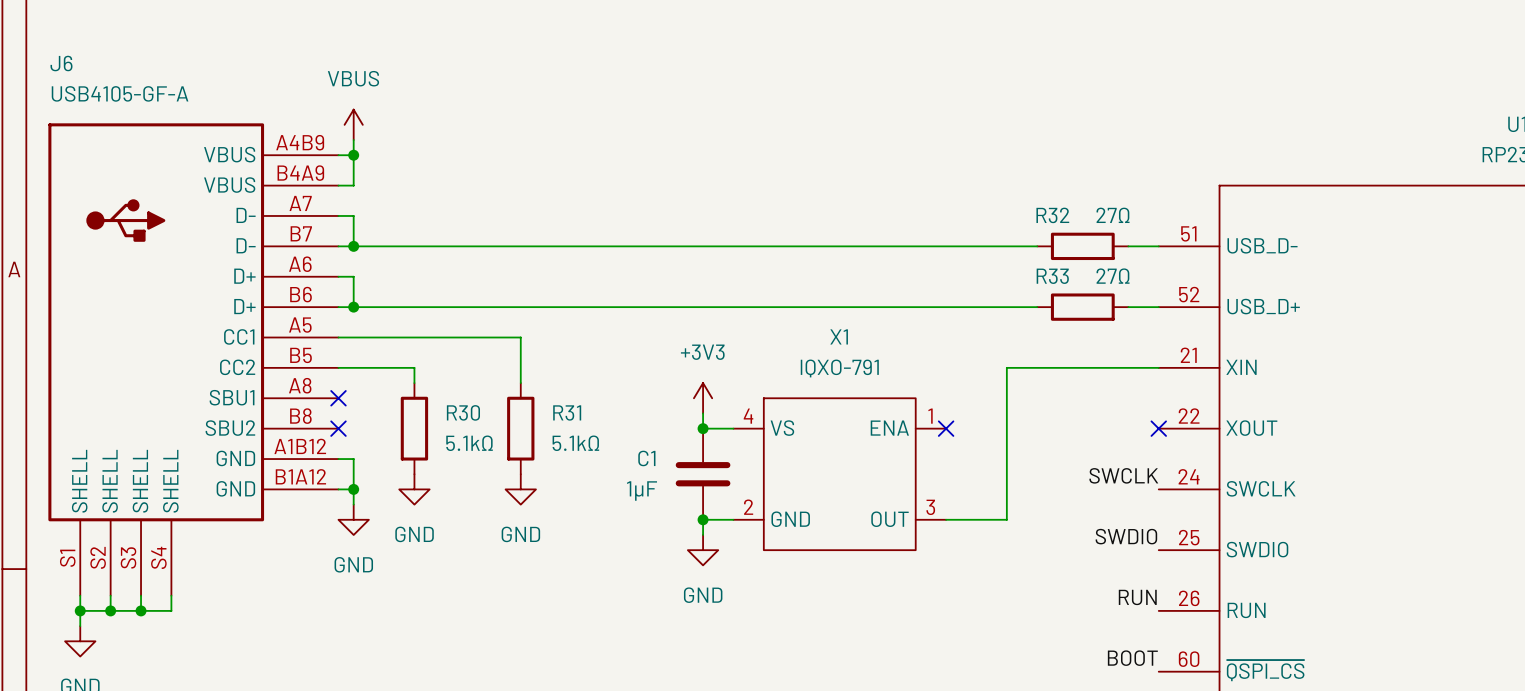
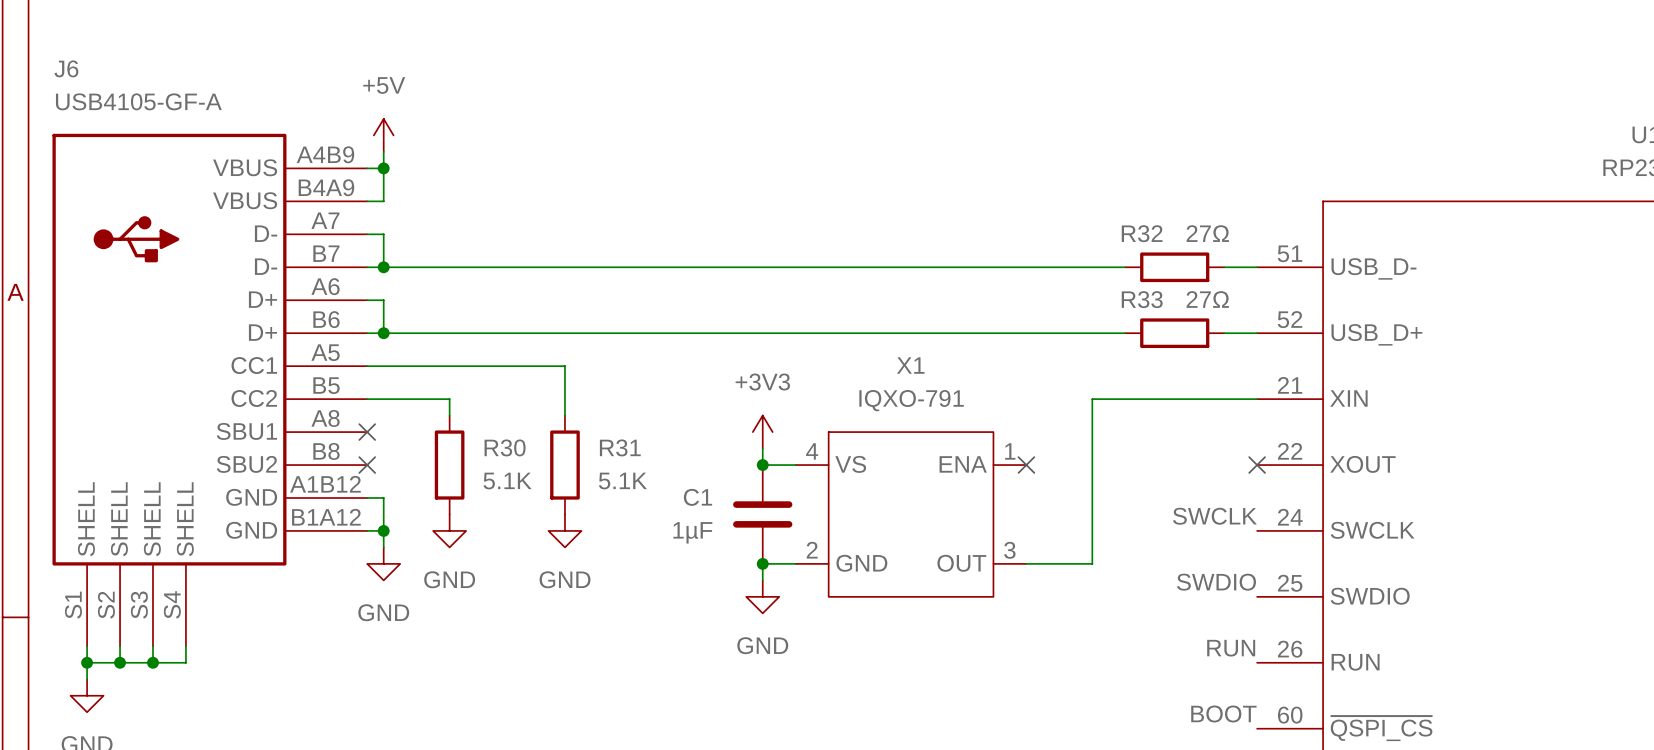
power symbol: VBUS (353, 124) -> +5V (383, 135)
R30 value: 5.1kΩ (469, 443) -> 5.1K (507, 481)
R31 value: 5.1kΩ (575, 443) -> 5.1K (622, 481)

